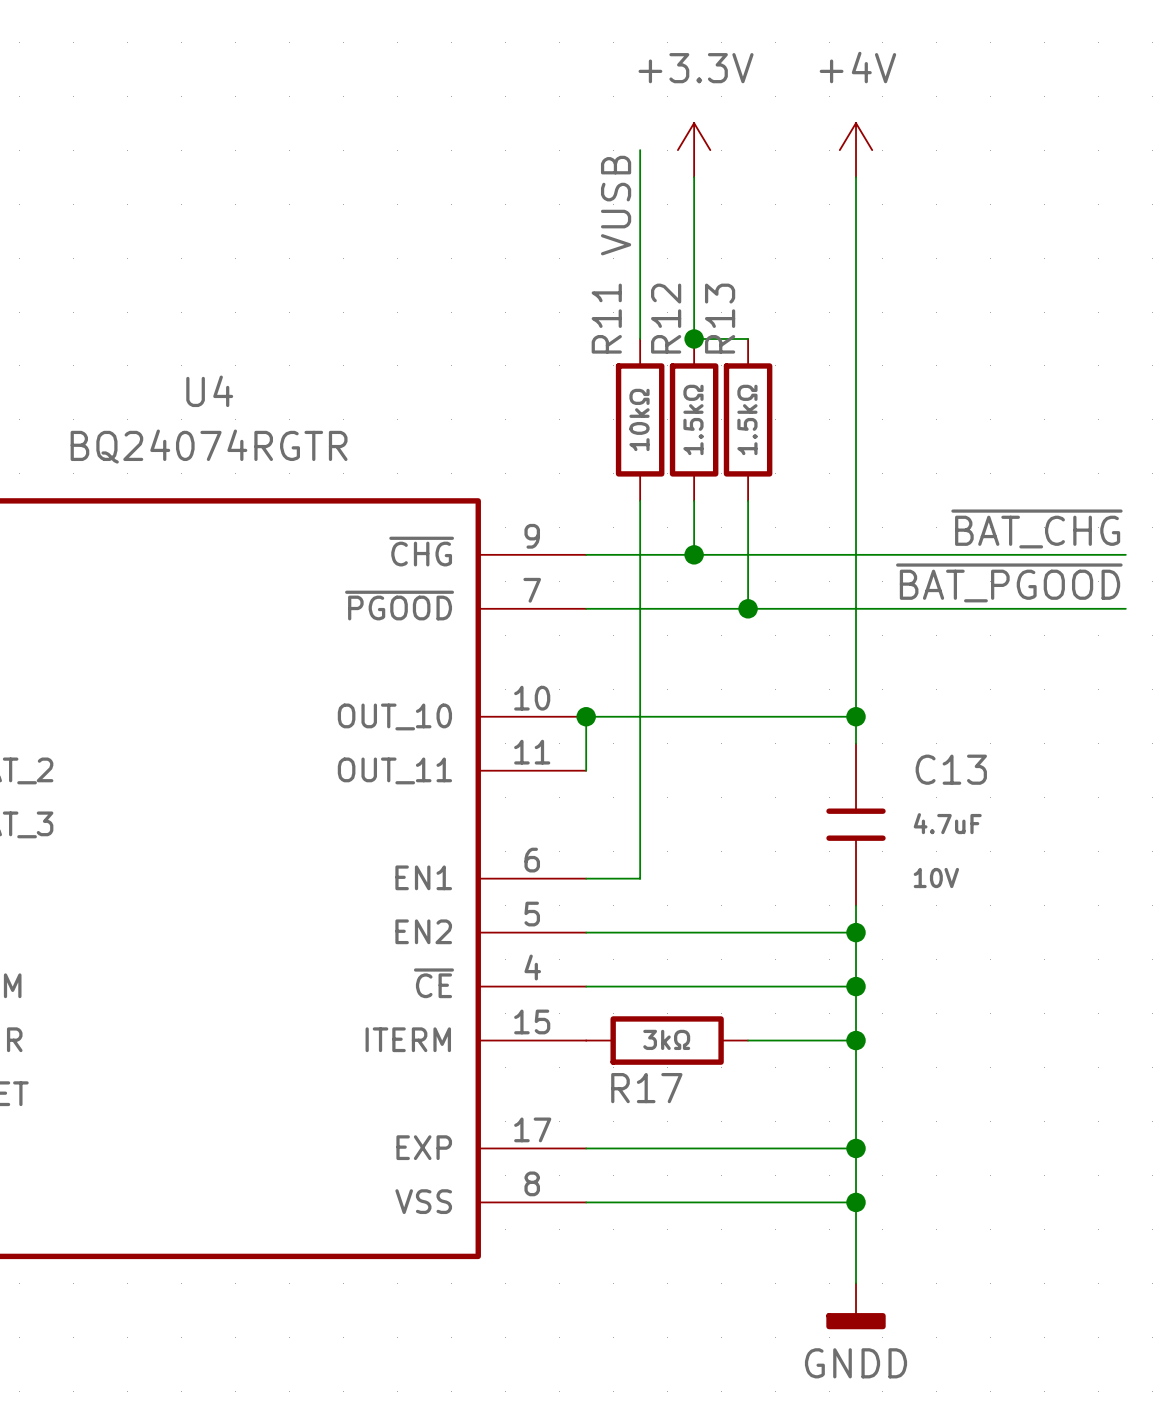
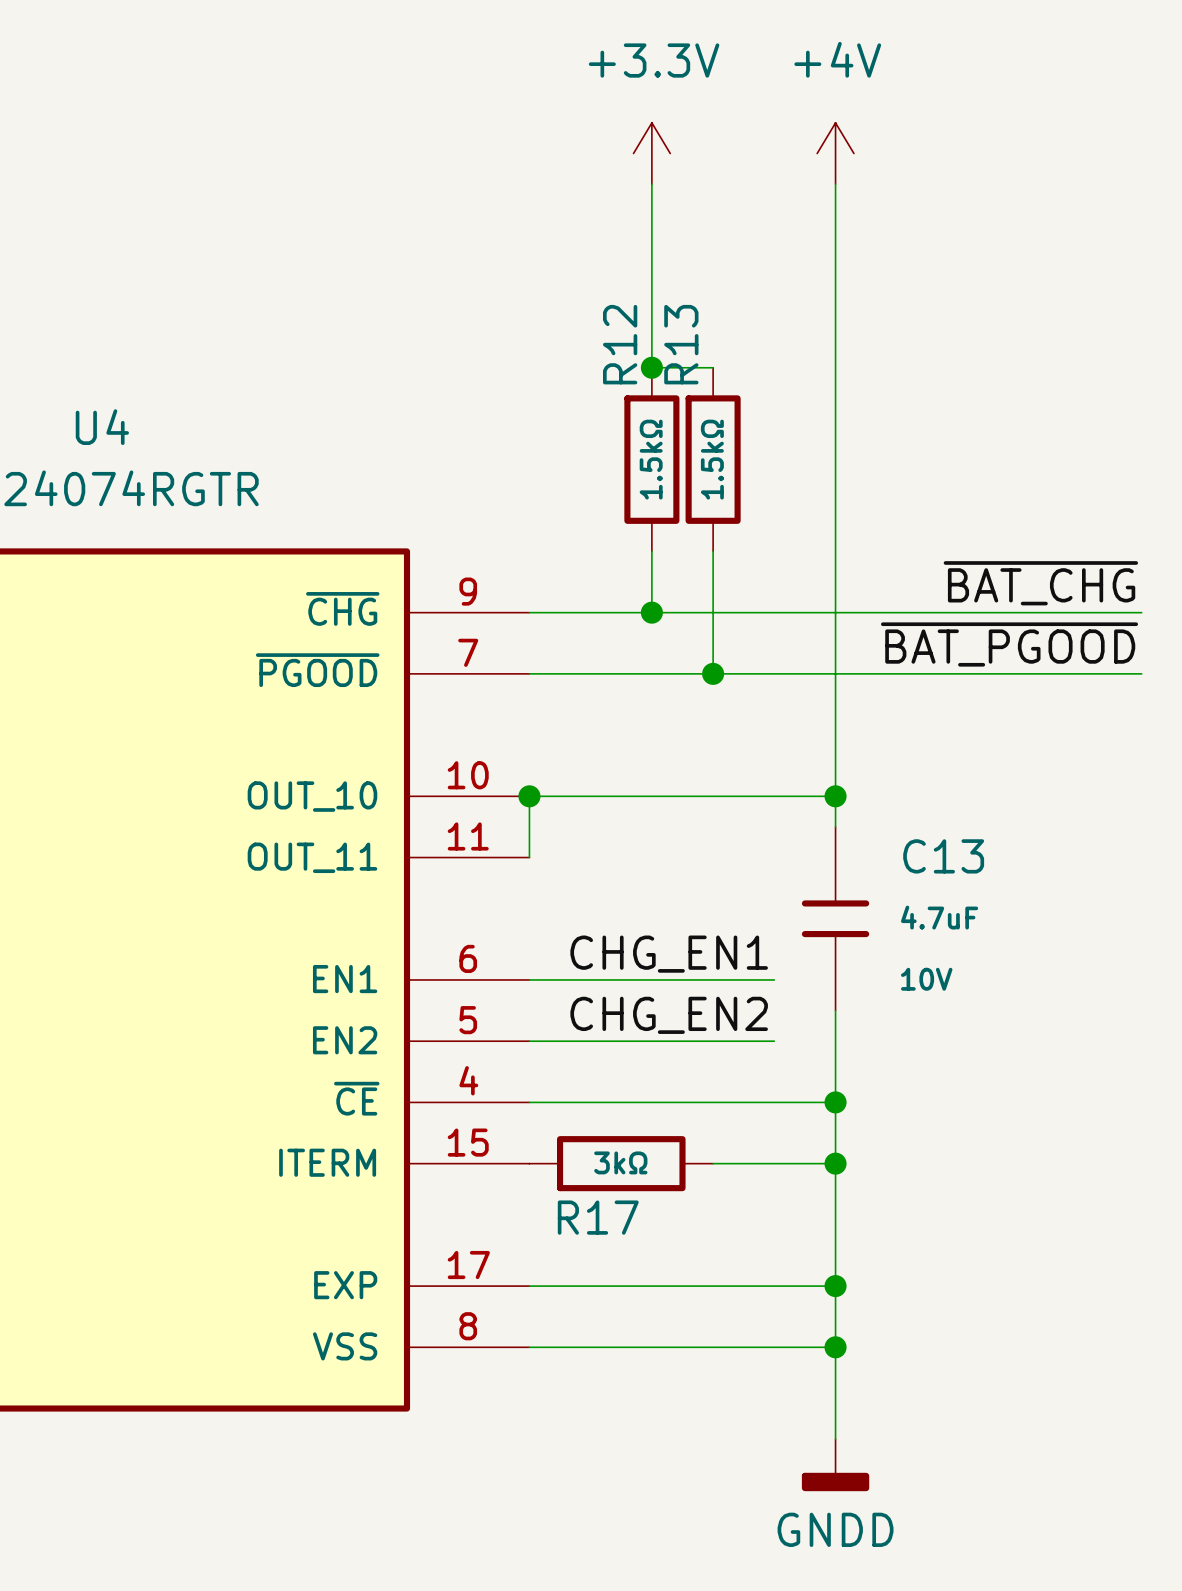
wire: (640, 150) (640, 338) -> none
label: VUSB (616, 205) -> none
R11: 10kΩ (640, 419) -> none
wire: (640, 500) (640, 878) -> (774, 979) (590, 979)
label: none -> CHG_EN1 (669, 954)
label: none -> CHG_EN2 (669, 1015)
wire: (802, 932) (856, 932) -> none
junction: (856, 932) -> none

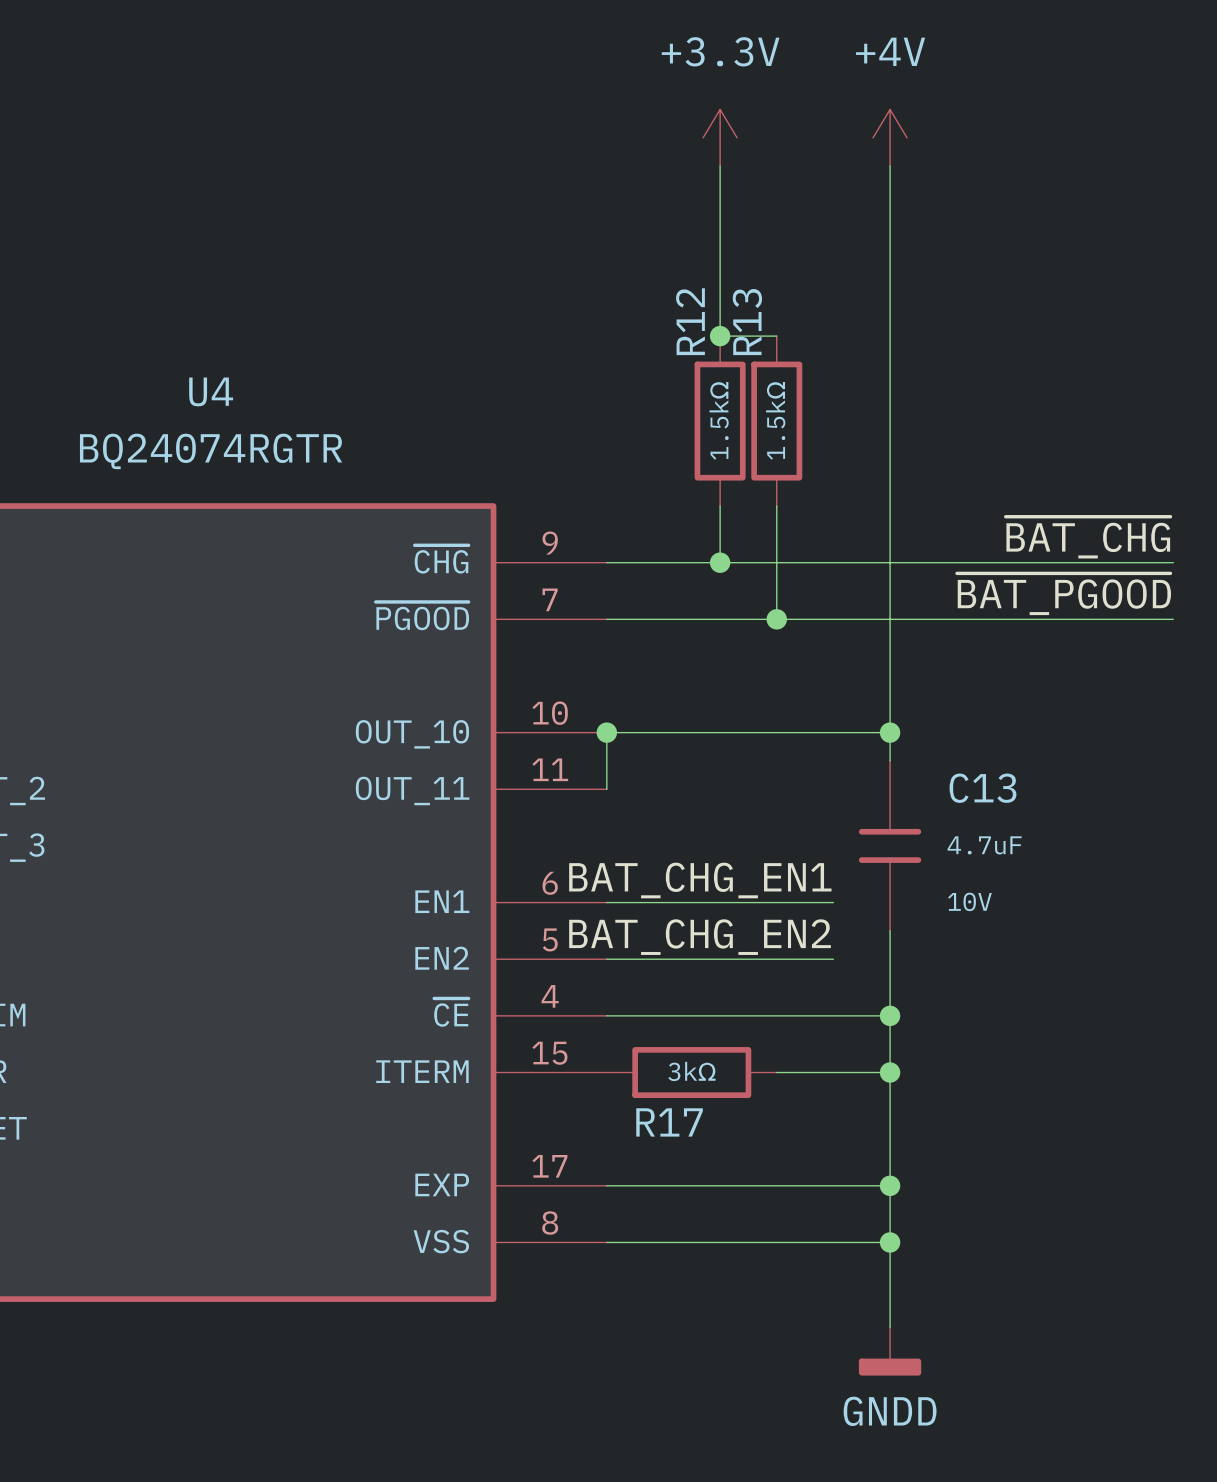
label: CHG_EN1 (669, 954) -> BAT_CHG_EN1 (700, 880)
label: CHG_EN2 (669, 1015) -> BAT_CHG_EN2 (700, 937)

